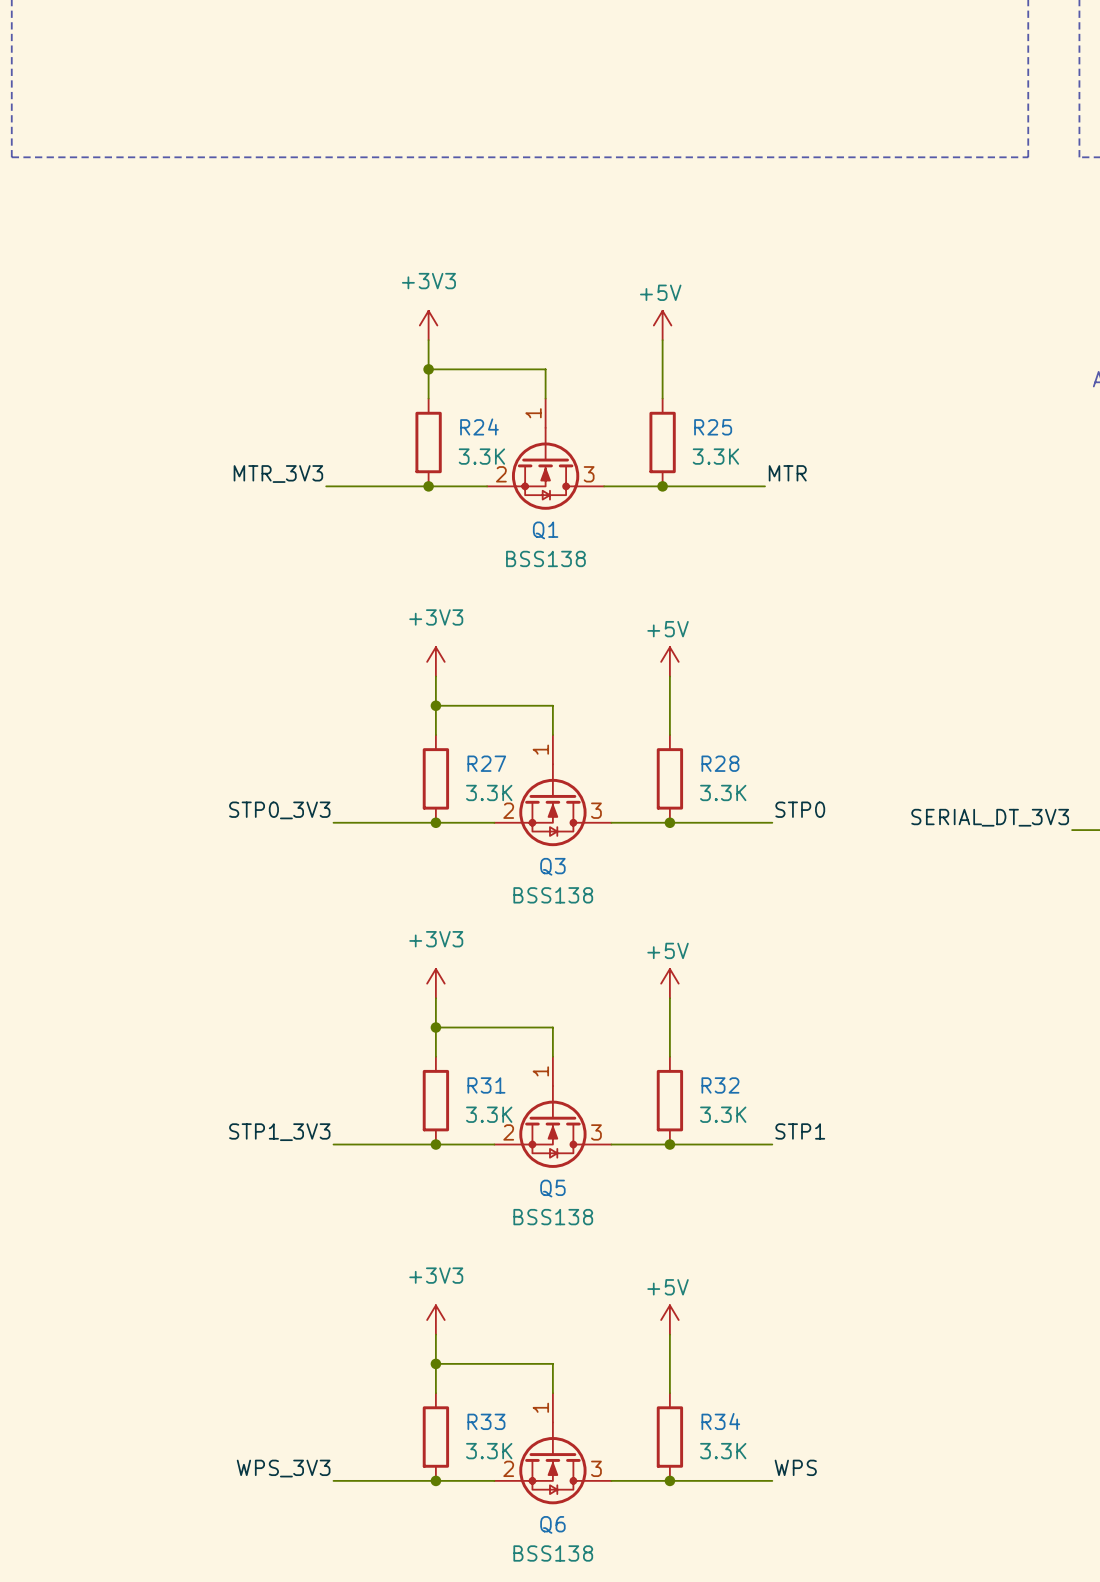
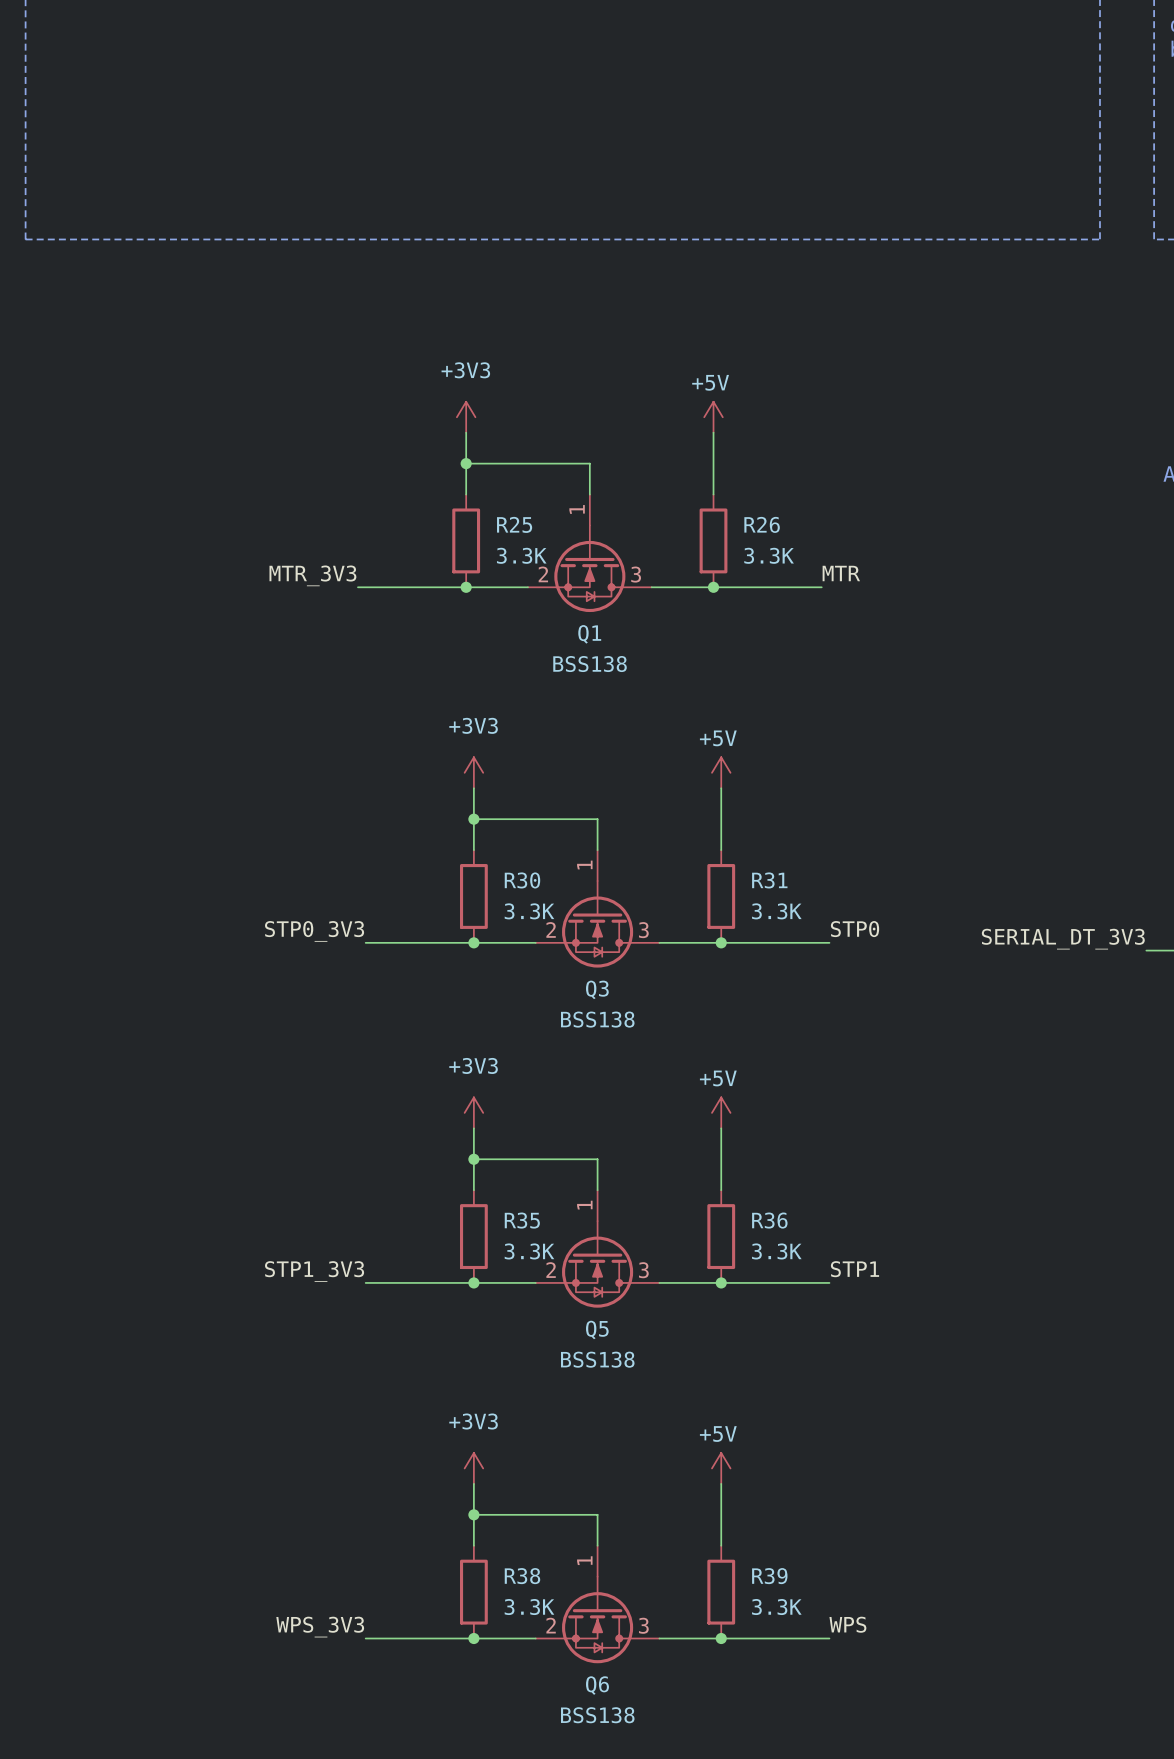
R24 name: R24 (479, 426) -> R25 (514, 524)
R25 name: R25 (713, 427) -> R26 (762, 524)
R27 name: R27 (486, 763) -> R30 (522, 880)
R28 name: R28 (720, 763) -> R31 (769, 880)
R31 name: R31 (486, 1085) -> R35 (522, 1220)
R32 name: R32 (720, 1085) -> R36 (769, 1220)
R33 name: R33 (486, 1421) -> R38 (522, 1576)
R34 name: R34 (720, 1421) -> R39 (769, 1576)

